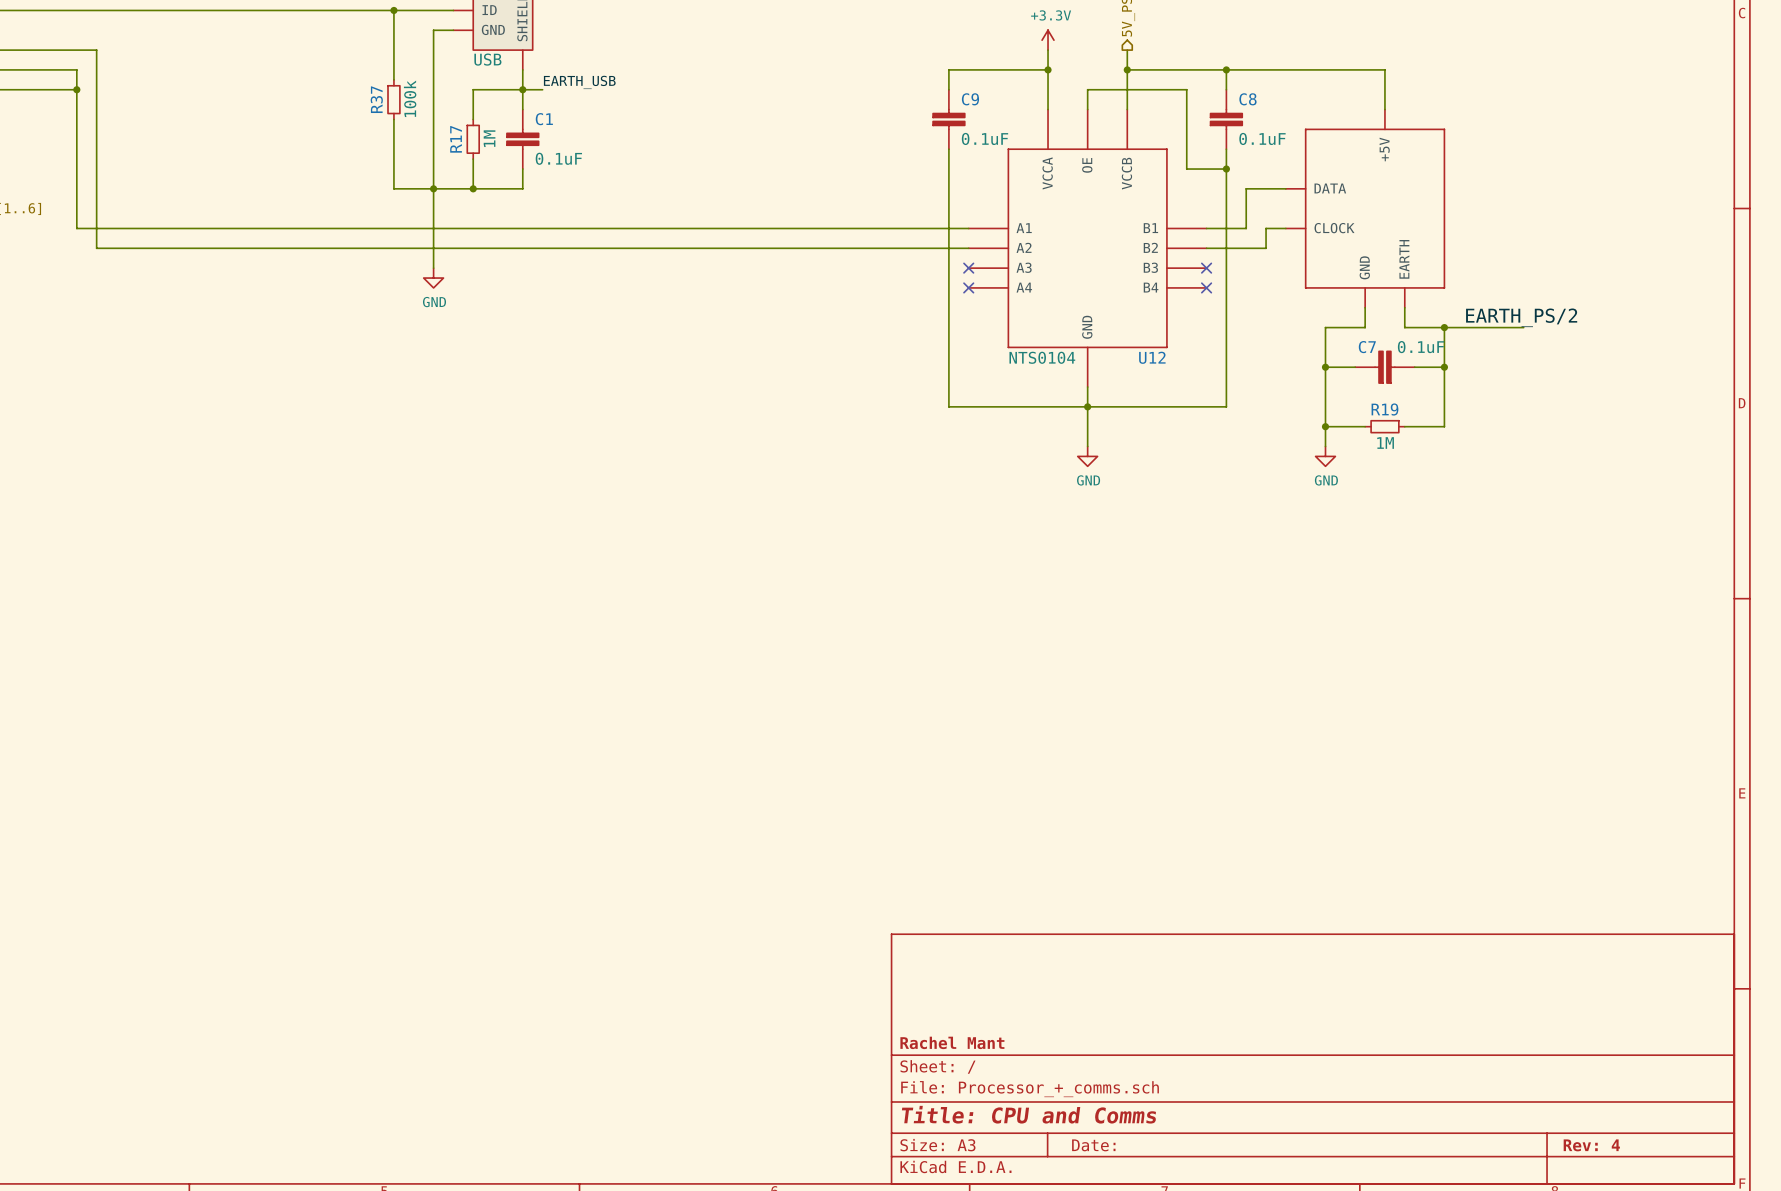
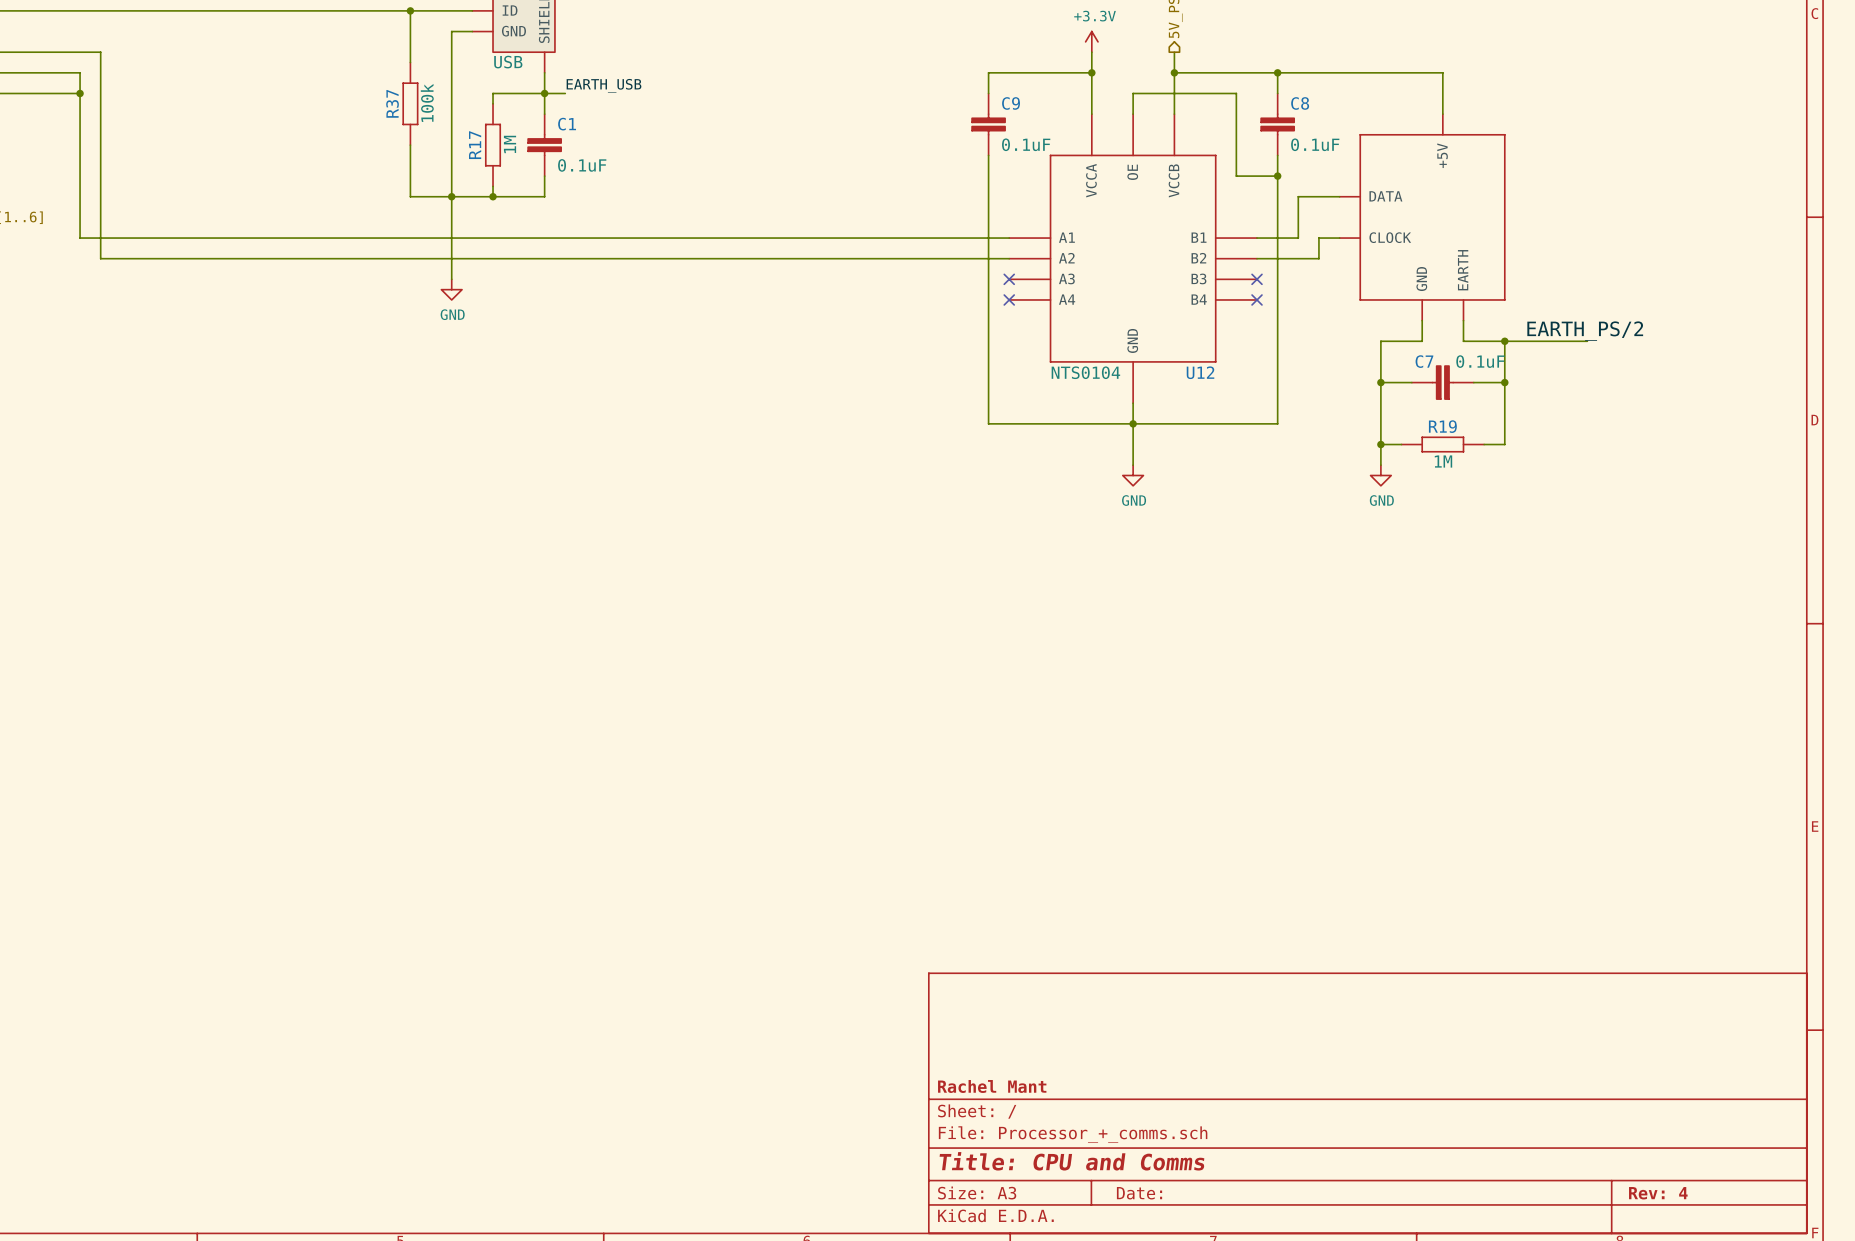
R37 symbol: [387, 79, 401, 120] -> [403, 62, 418, 146]
R17 symbol: [466, 119, 480, 160] -> [485, 103, 501, 187]
R19 symbol: [1365, 419, 1405, 434] -> [1401, 437, 1485, 452]

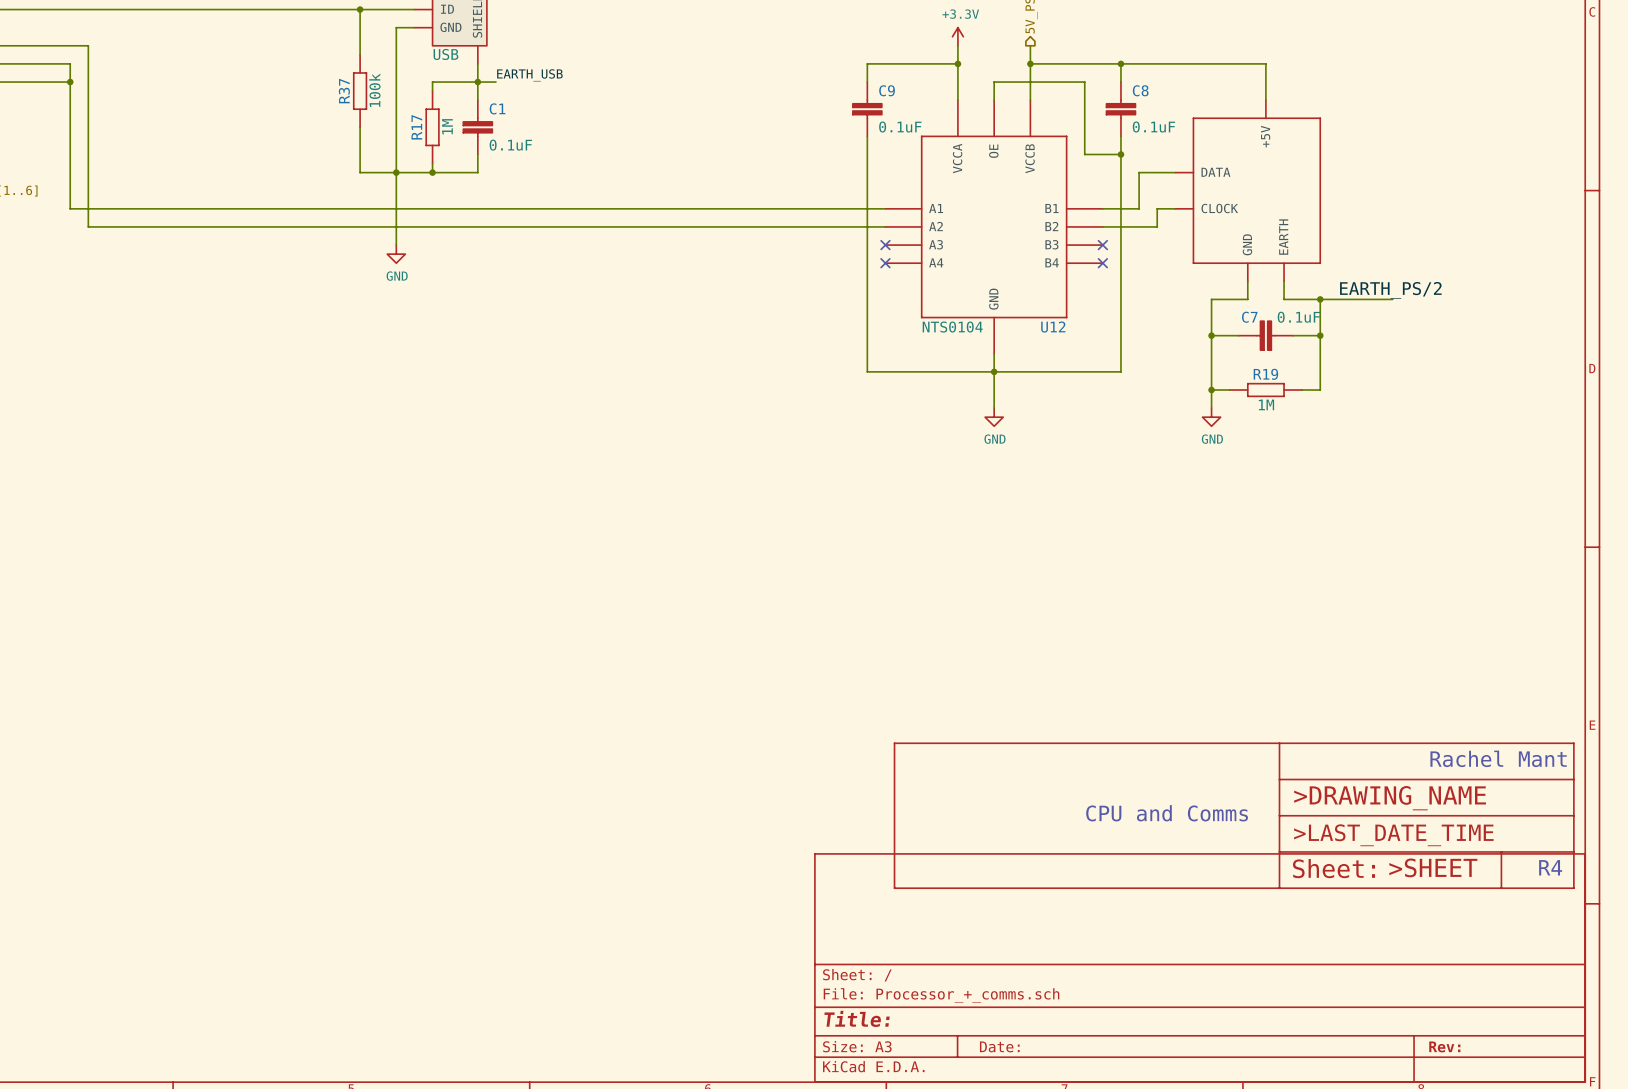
text: none -> Rachel Mant (1498, 758)
text: none -> CPU and Comms (1167, 813)
power symbol: none -> (1234, 815)
text: none -> R4 (1550, 867)
title block: Rachel Mant (992, 1086) -> none
title block: Title: CPU and Comms (1071, 1161) -> Title: (857, 1018)
title block: Rev: 4 (1658, 1193) -> Rev: (1444, 1046)

